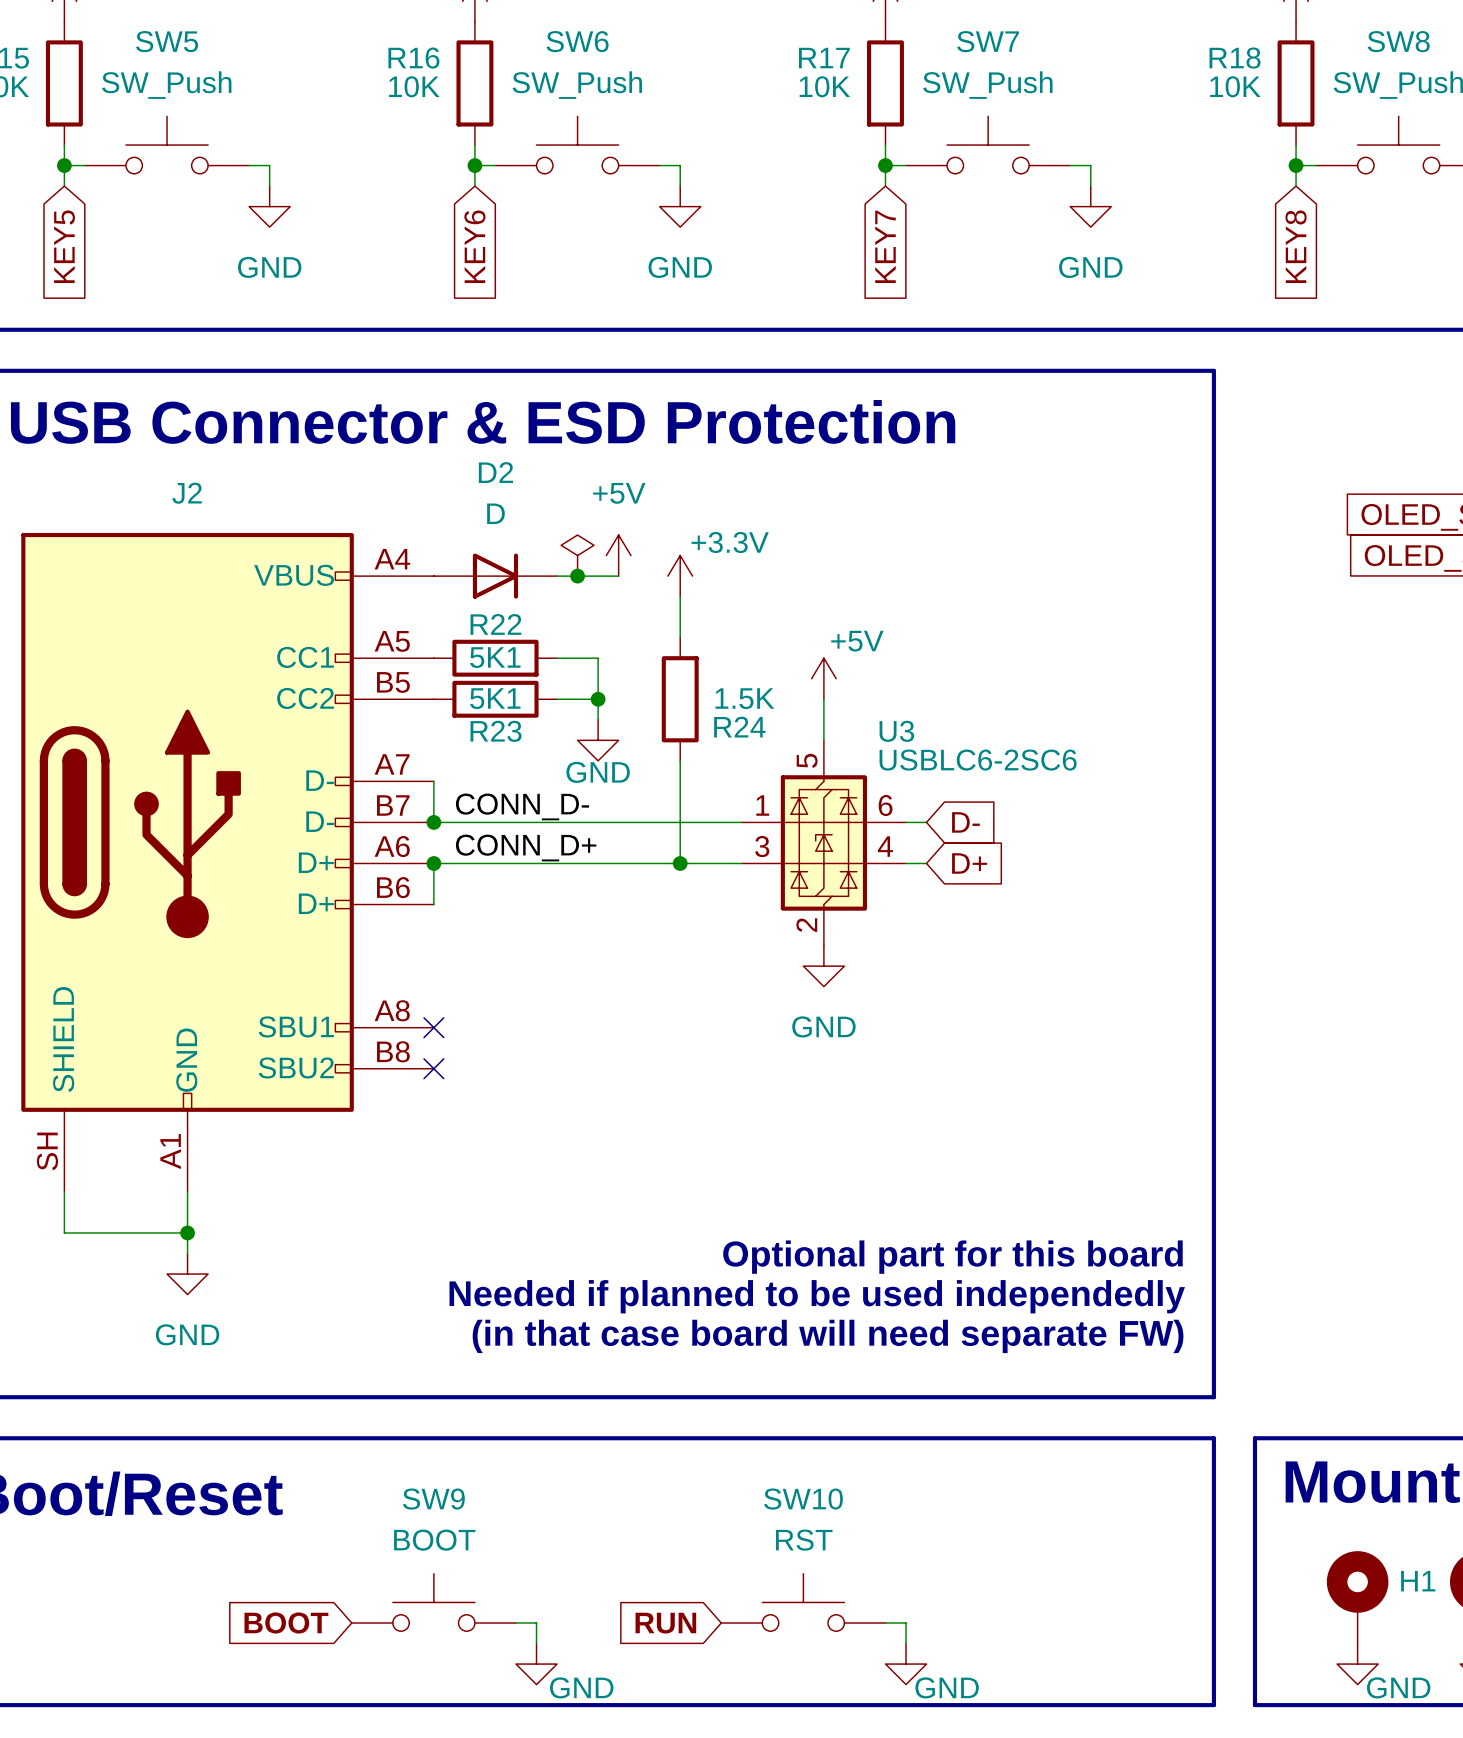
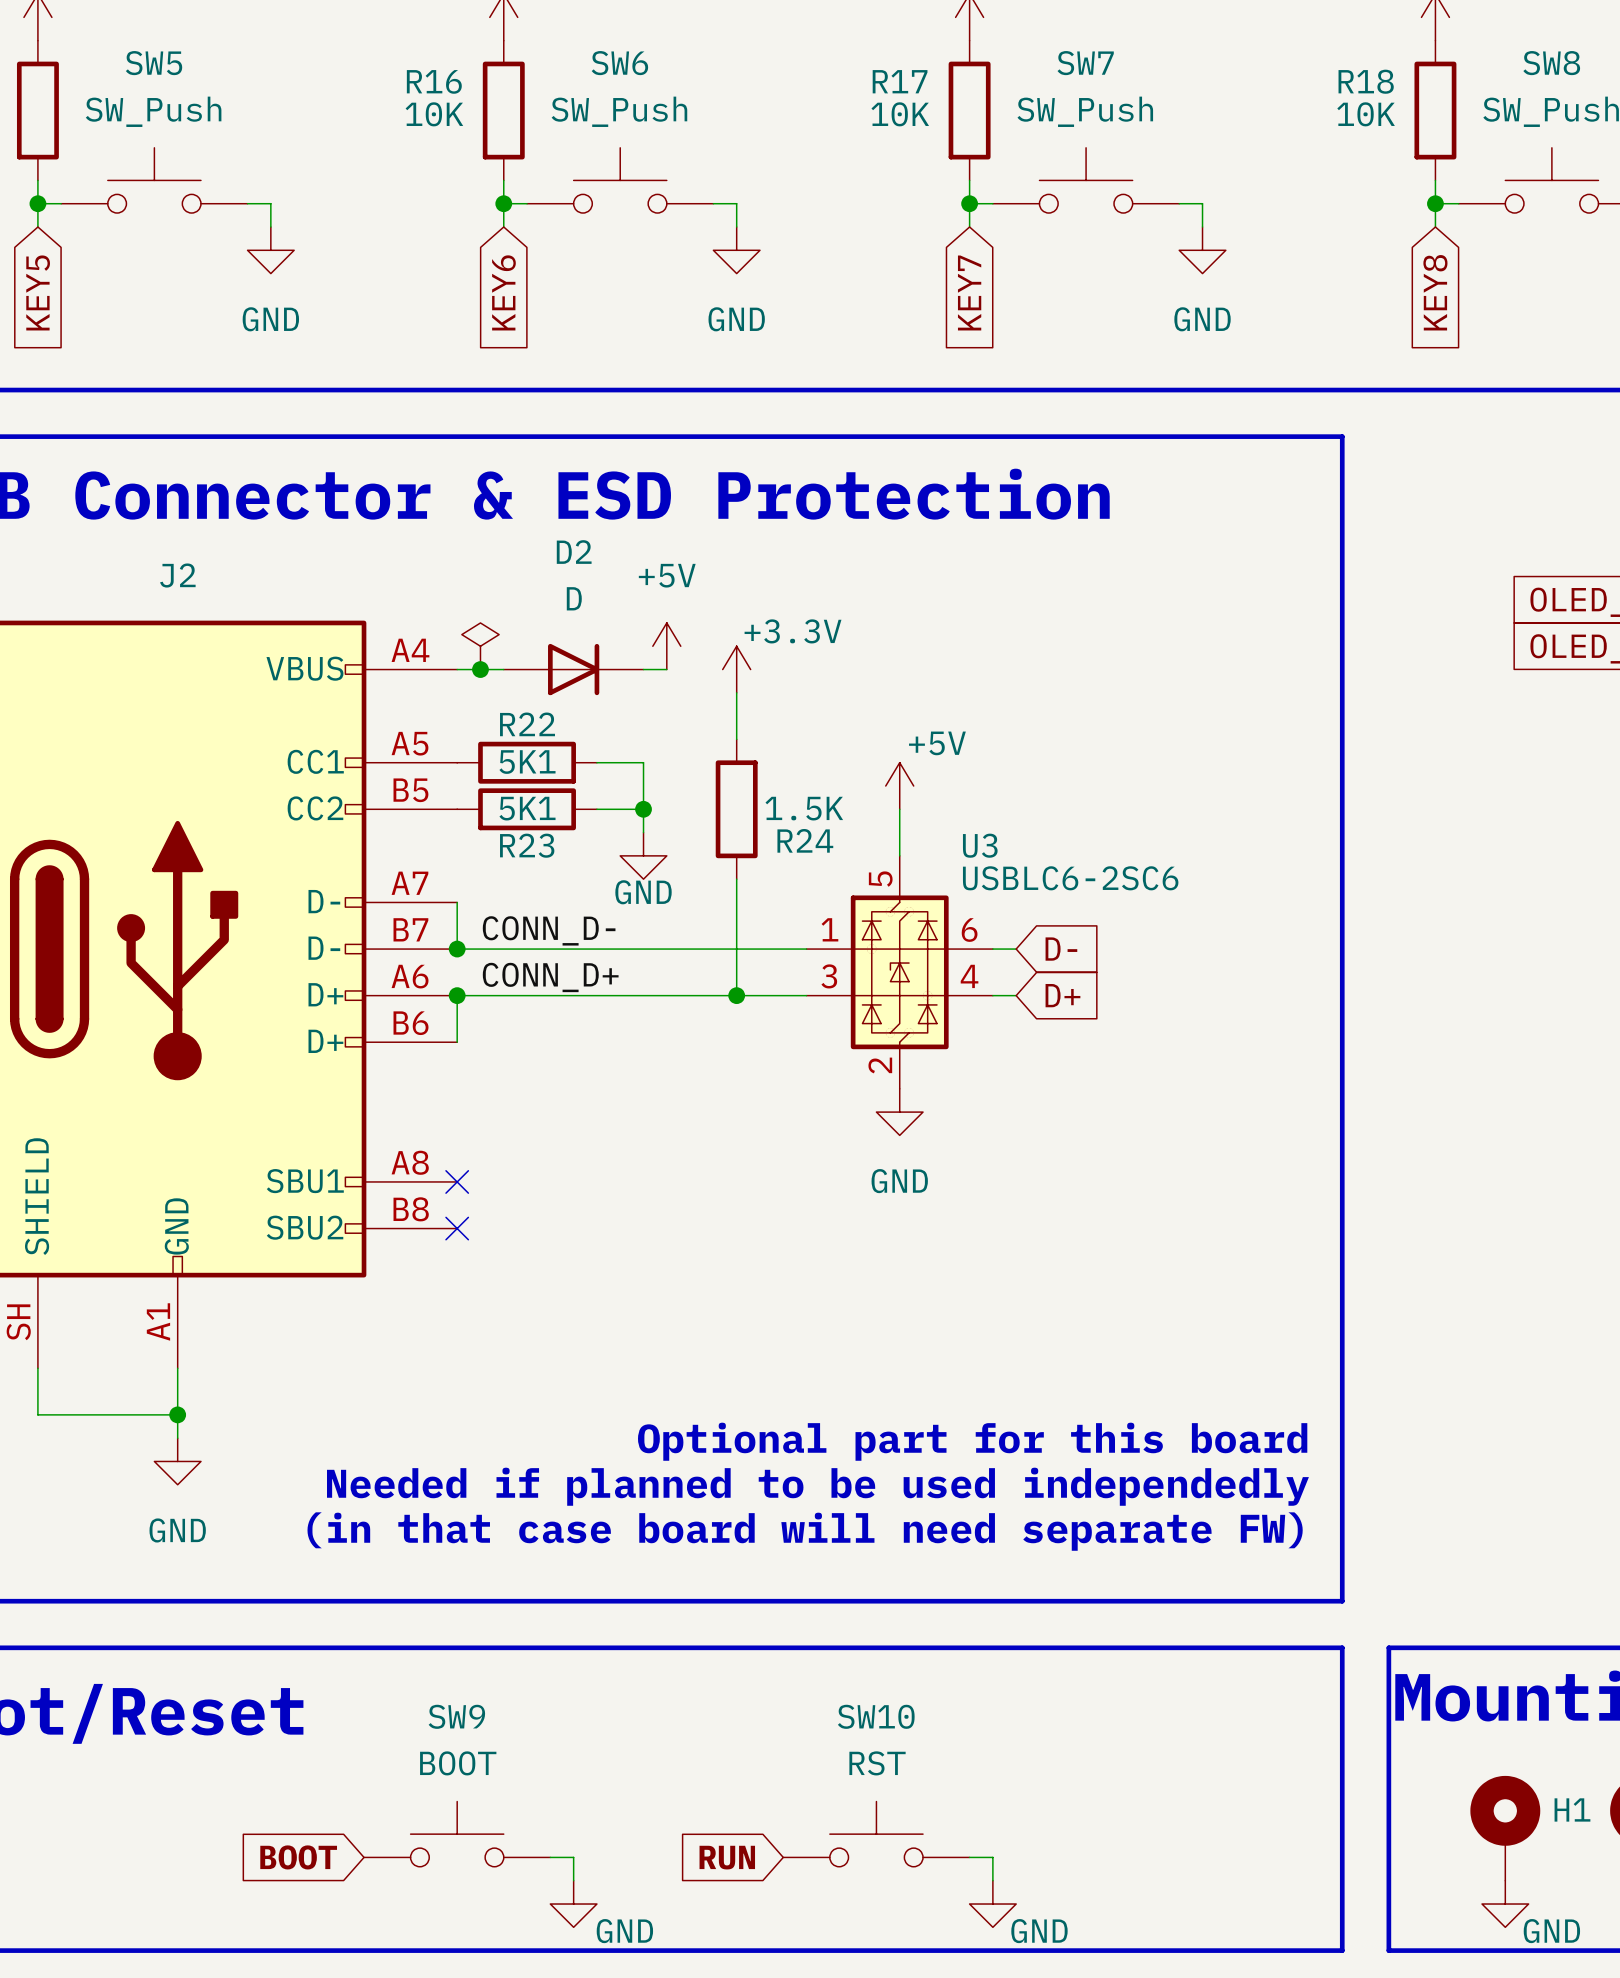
power symbol position: (577, 555) -> (480, 646)
junction: none -> (480, 669)
D2 position: (495, 576) -> (573, 669)
junction: (577, 576) -> none

